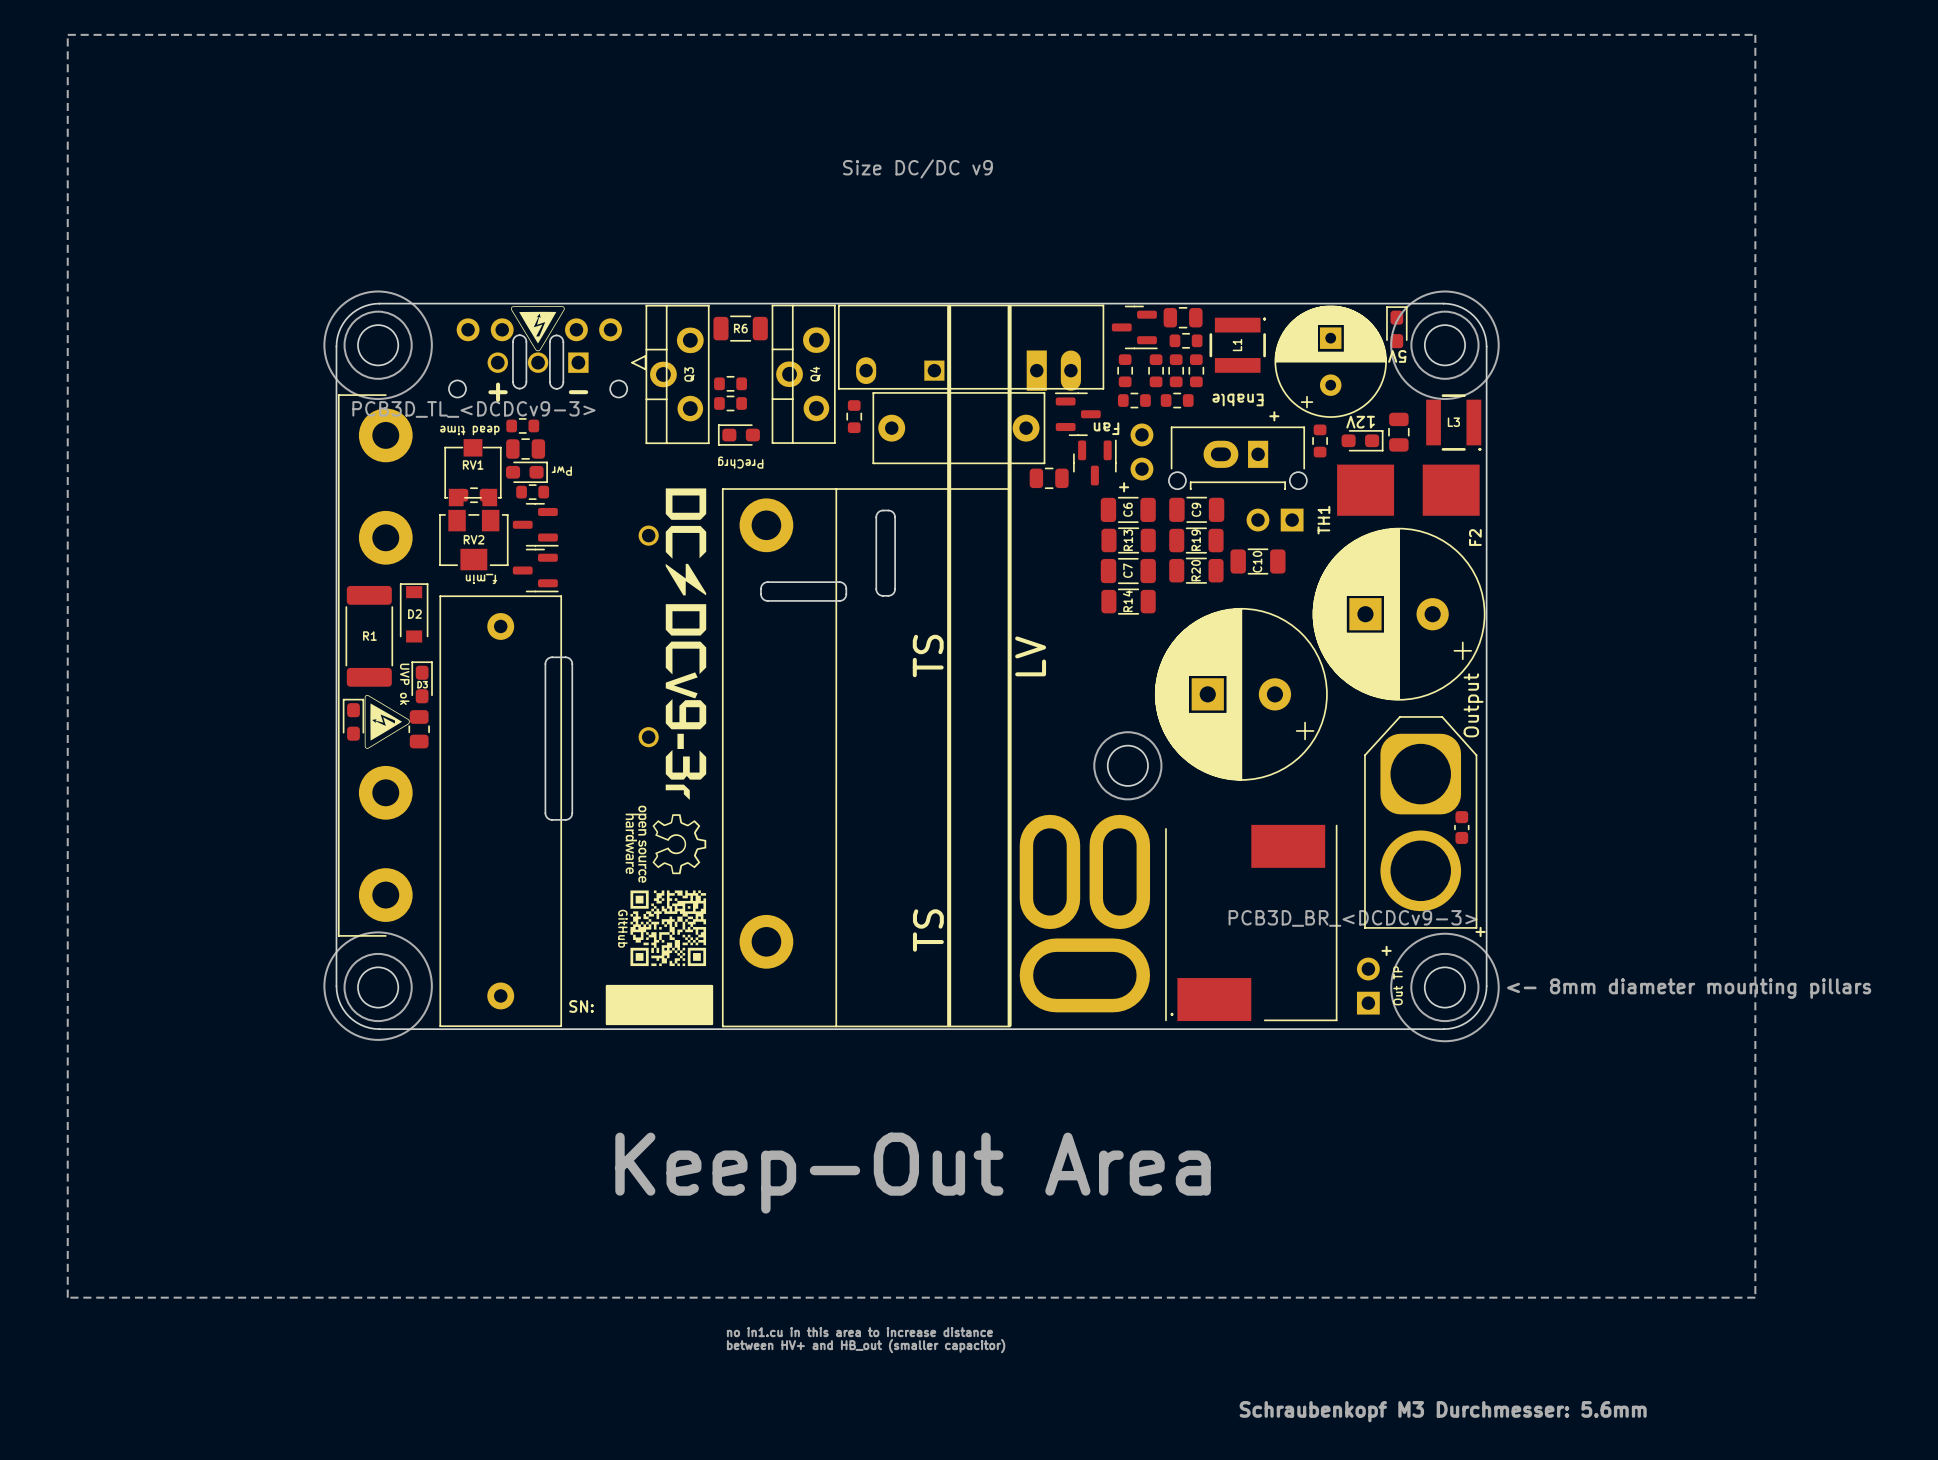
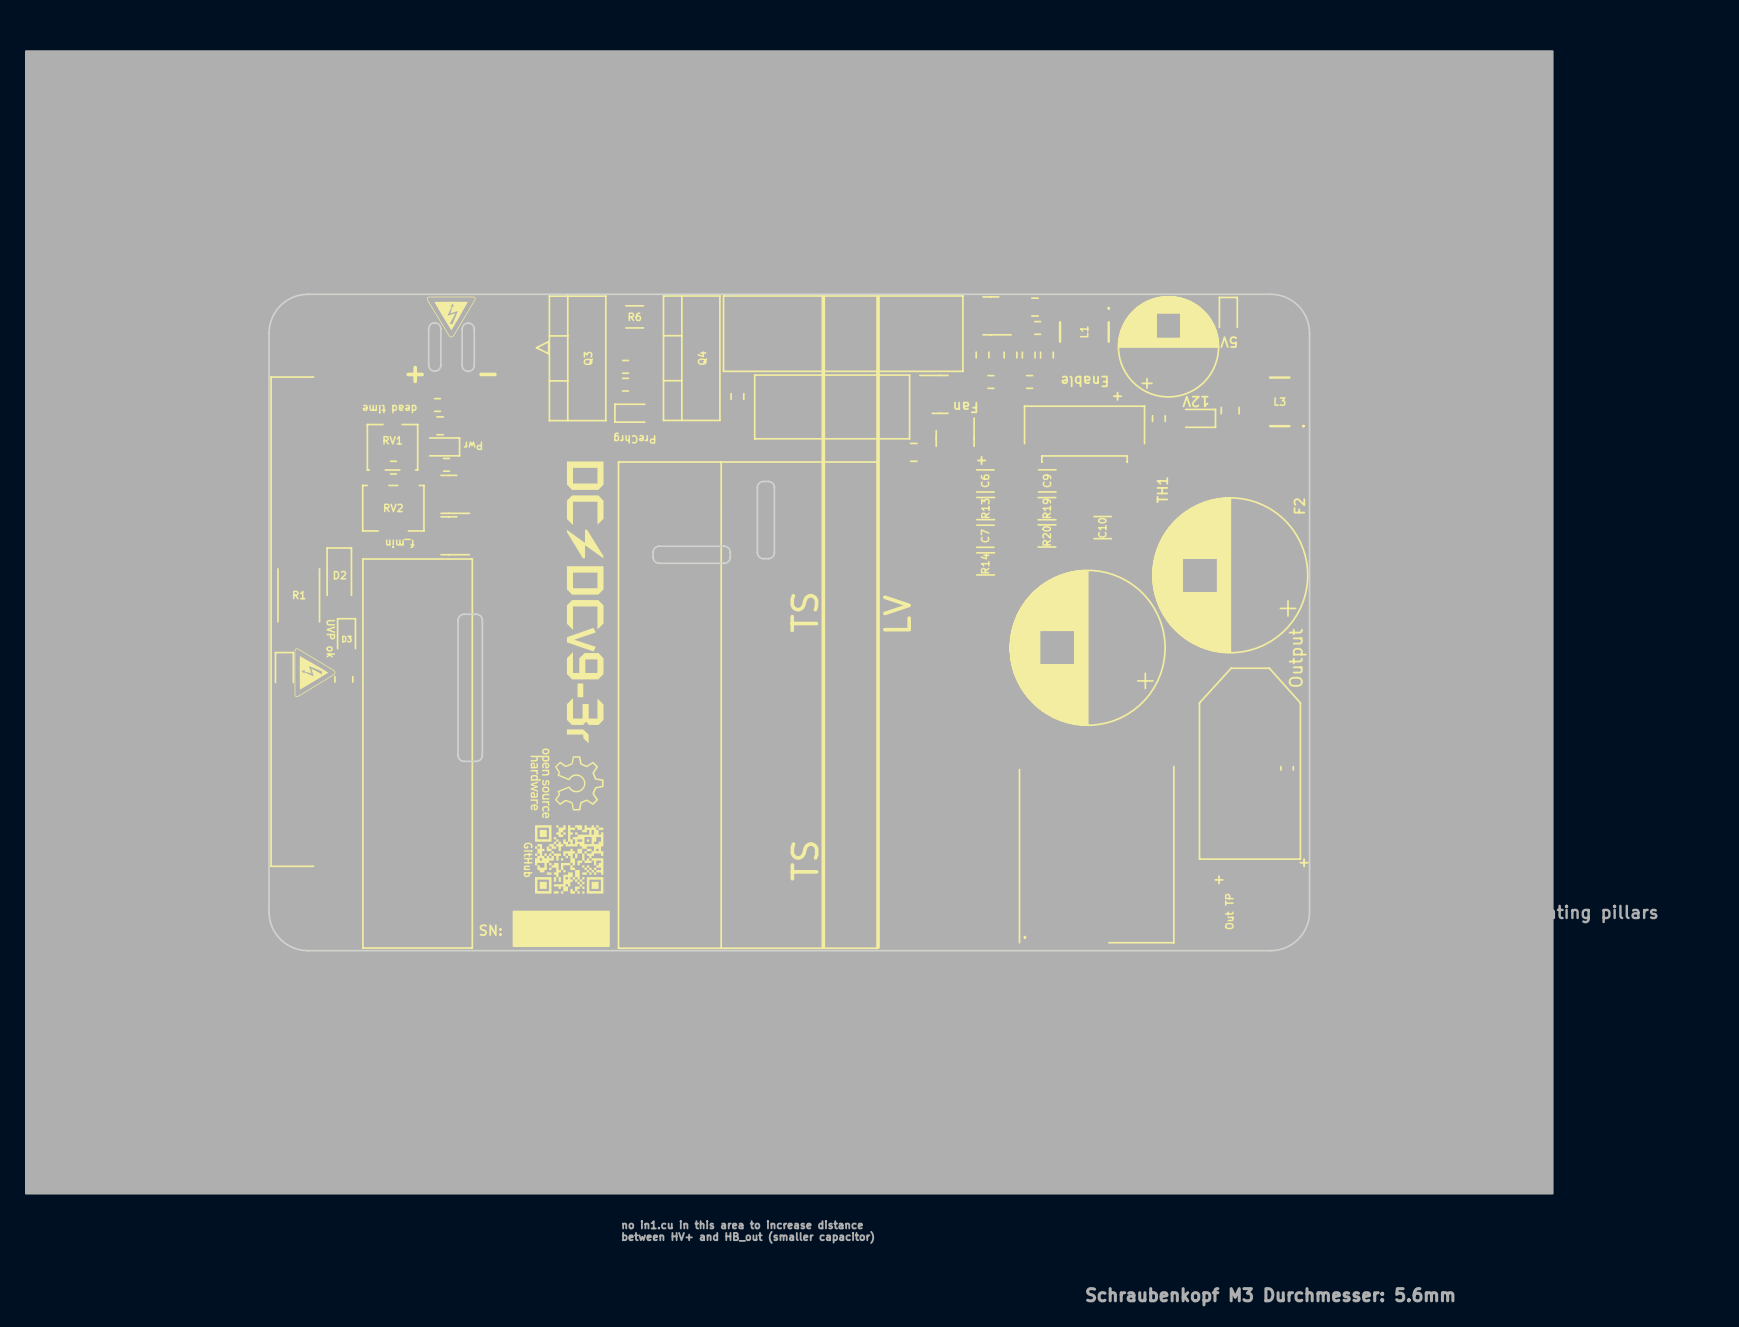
drawing: none -> [25, 50, 1554, 1195]
line: (67, 34) (1755, 34) (1755, 1297) (67, 1297) (67, 34) -> none

